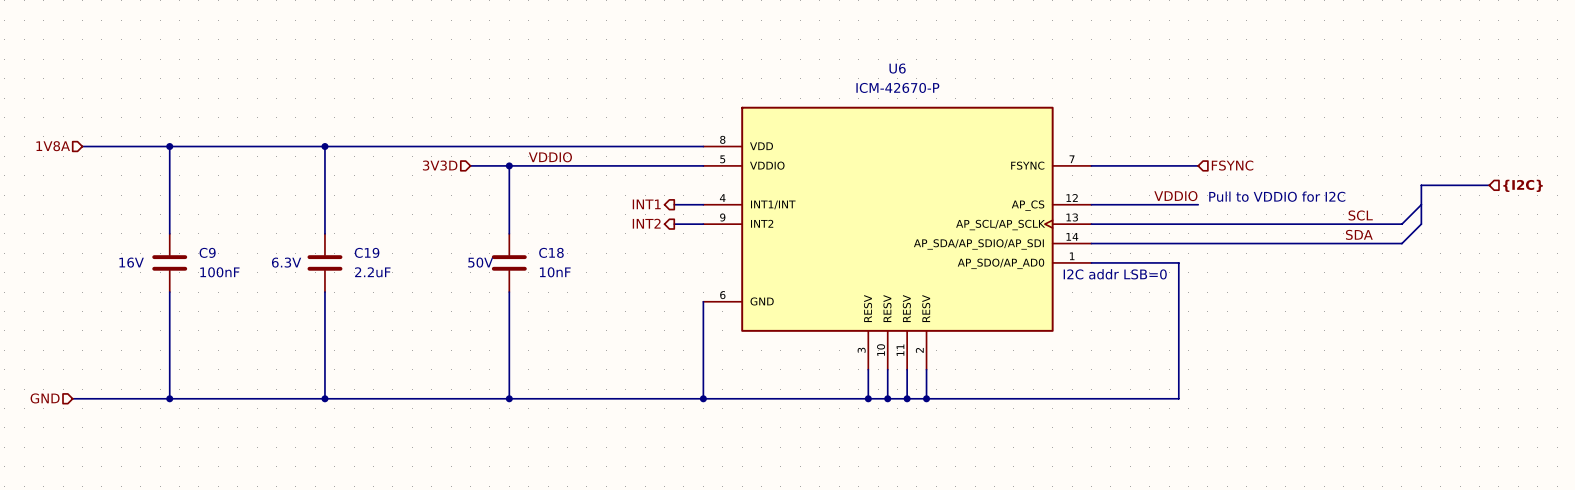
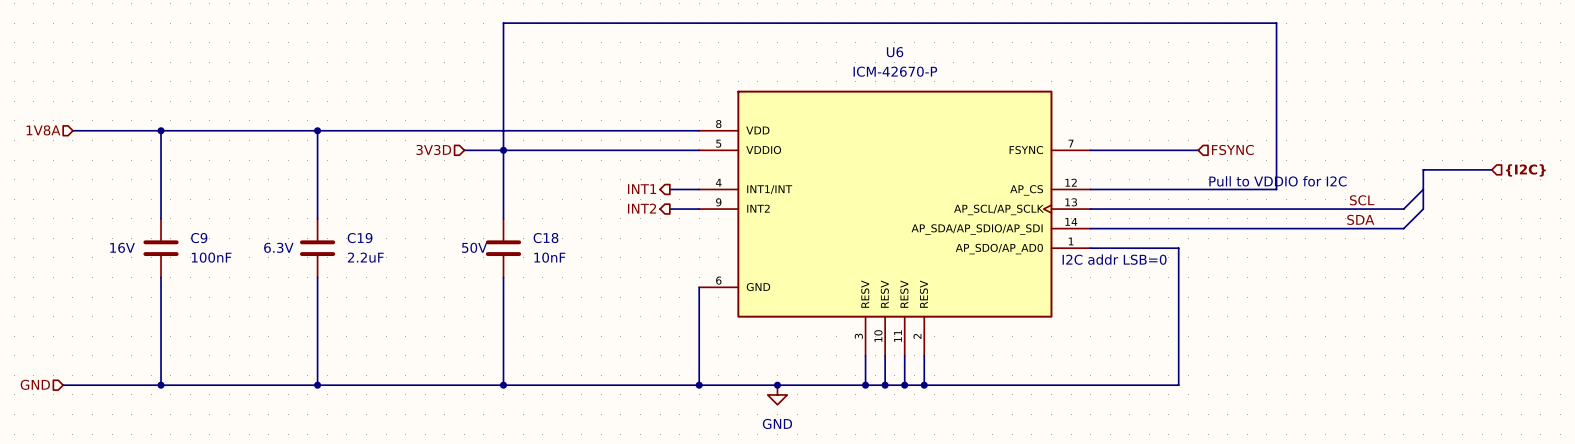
label: VDDIO (550, 157) -> none
wire: none -> (503, 150) (503, 23) (1276, 23) (1276, 189) (1198, 189)
label: VDDIO (1175, 196) -> none
junction: none -> (777, 385)
power symbol: none -> GND (777, 394)

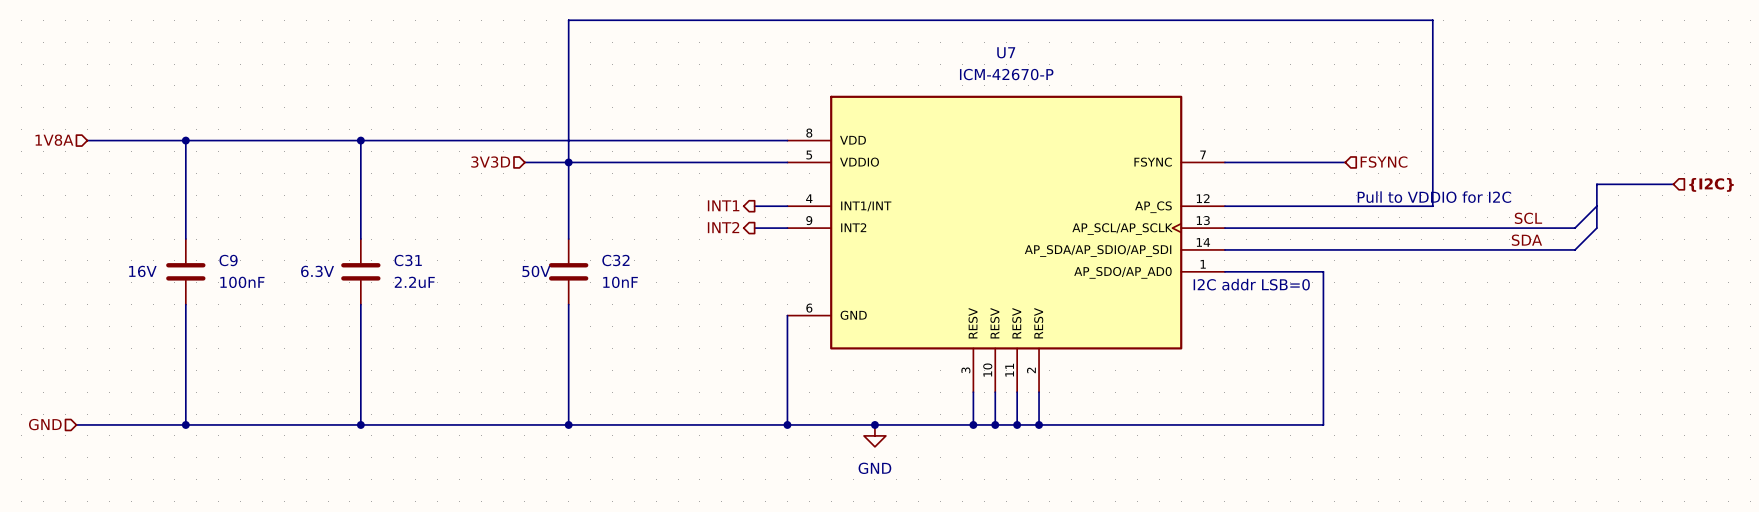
U6 name: U6 (895, 52) -> U7 (1006, 52)
C19 name: C19 (360, 238) -> C31 (408, 260)
C18 name: C18 (545, 238) -> C32 (615, 260)

